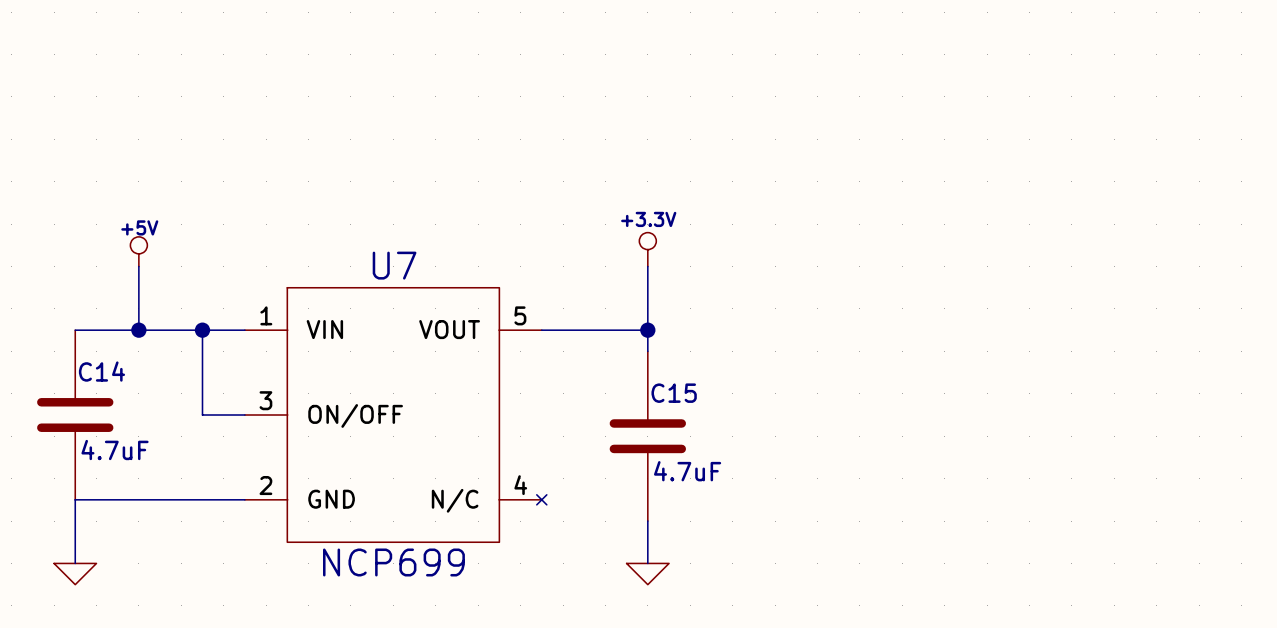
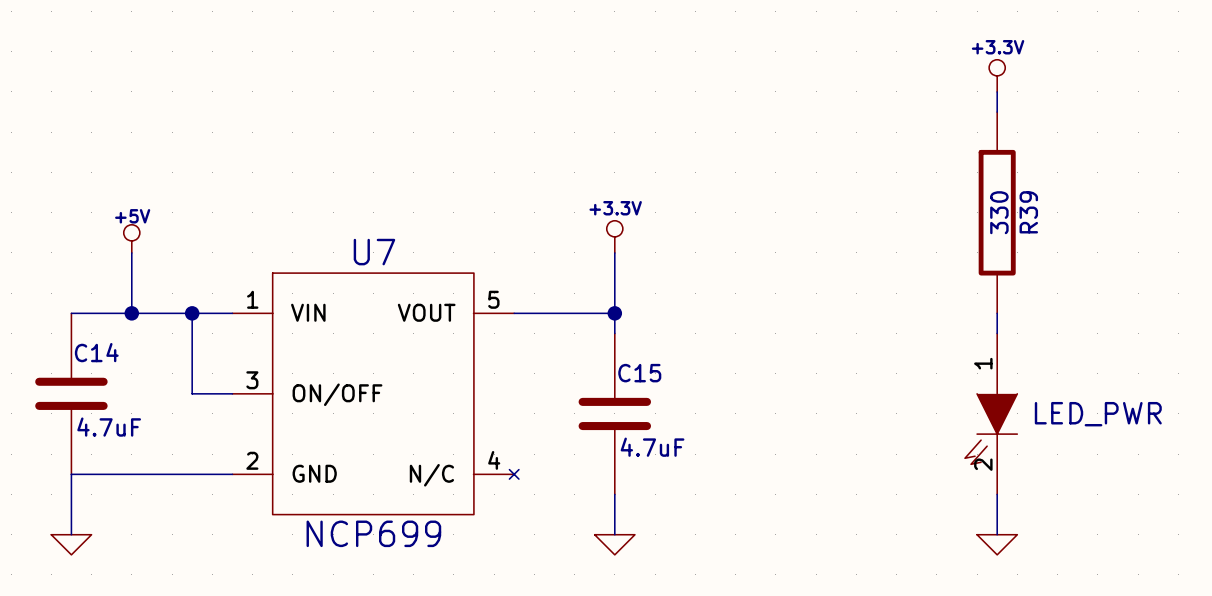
power symbol: none -> +3.3V (997, 75)
wire: none -> (997, 91) (997, 112)
R39: none -> 330 (997, 212)
wire: none -> (997, 313) (997, 333)
part: none -> LED_PWR (991, 413)
wire: none -> (997, 494) (997, 534)
power symbol: none -> (997, 544)

